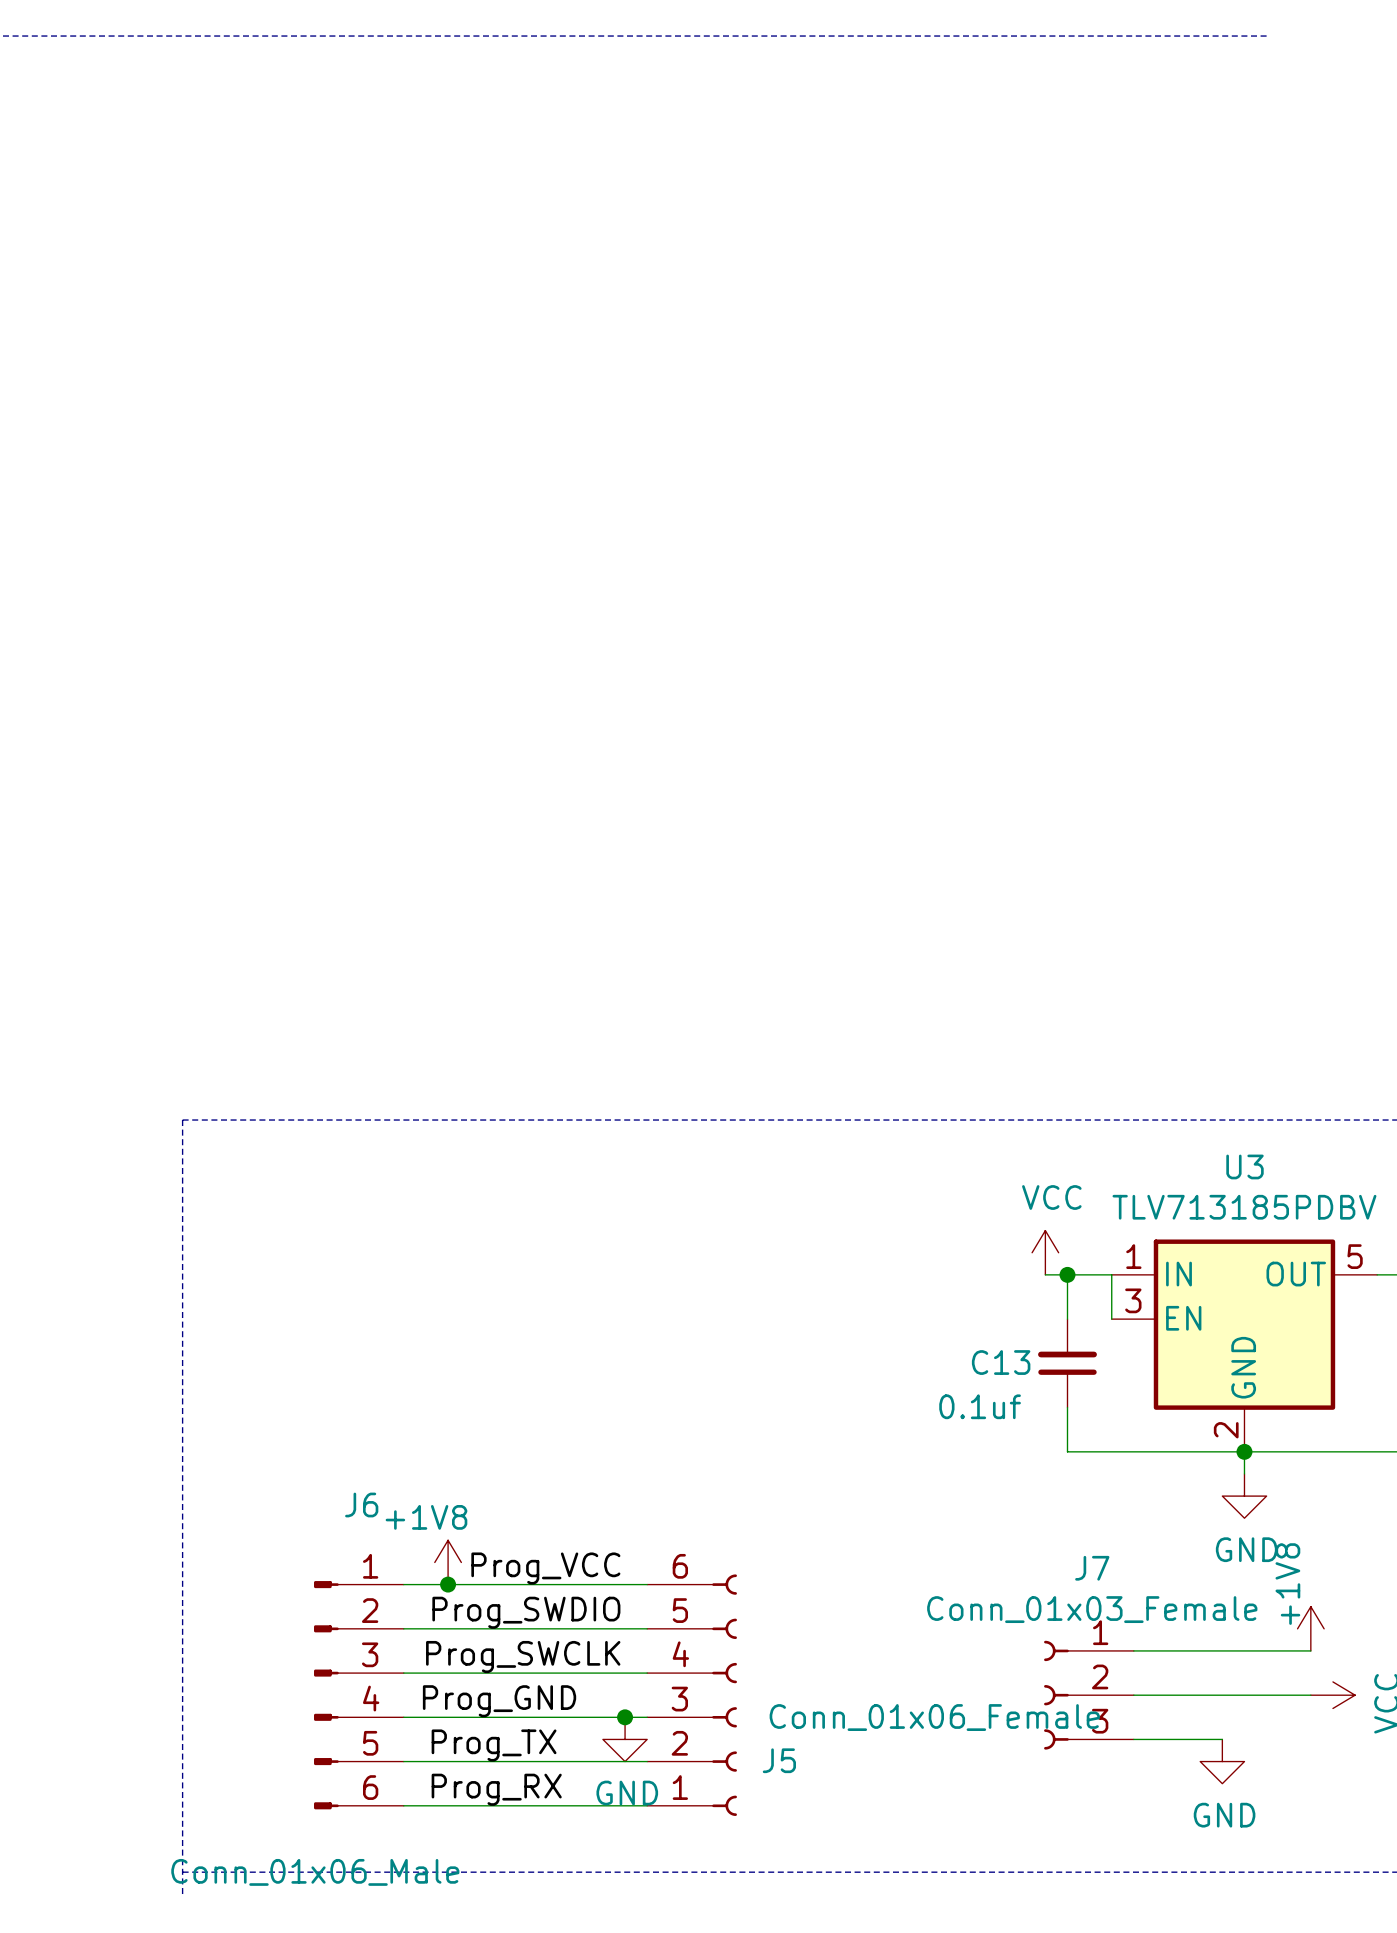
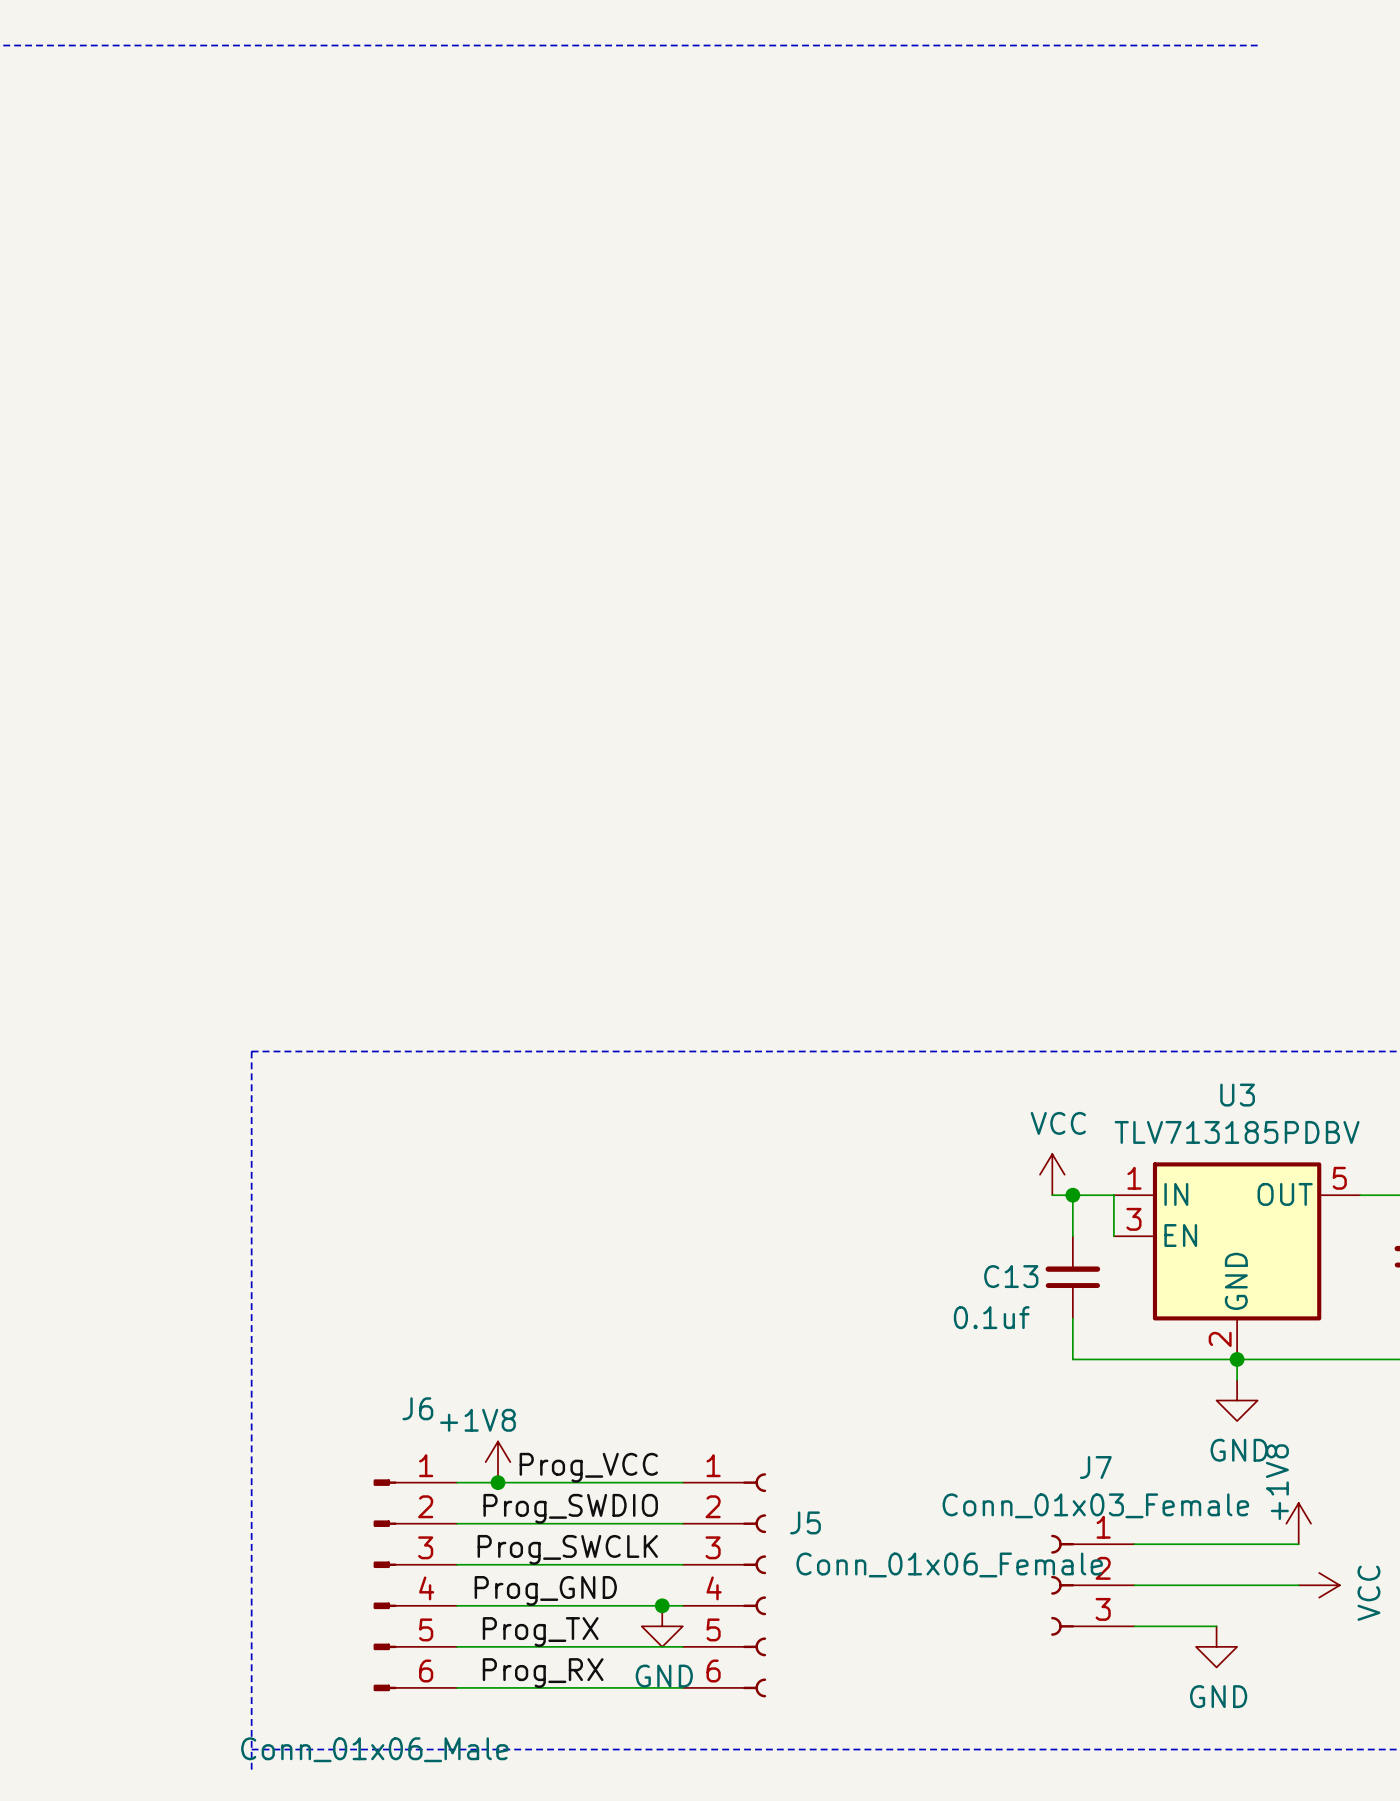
J5 flip: as is (724, 1695) -> up-down (754, 1585)

